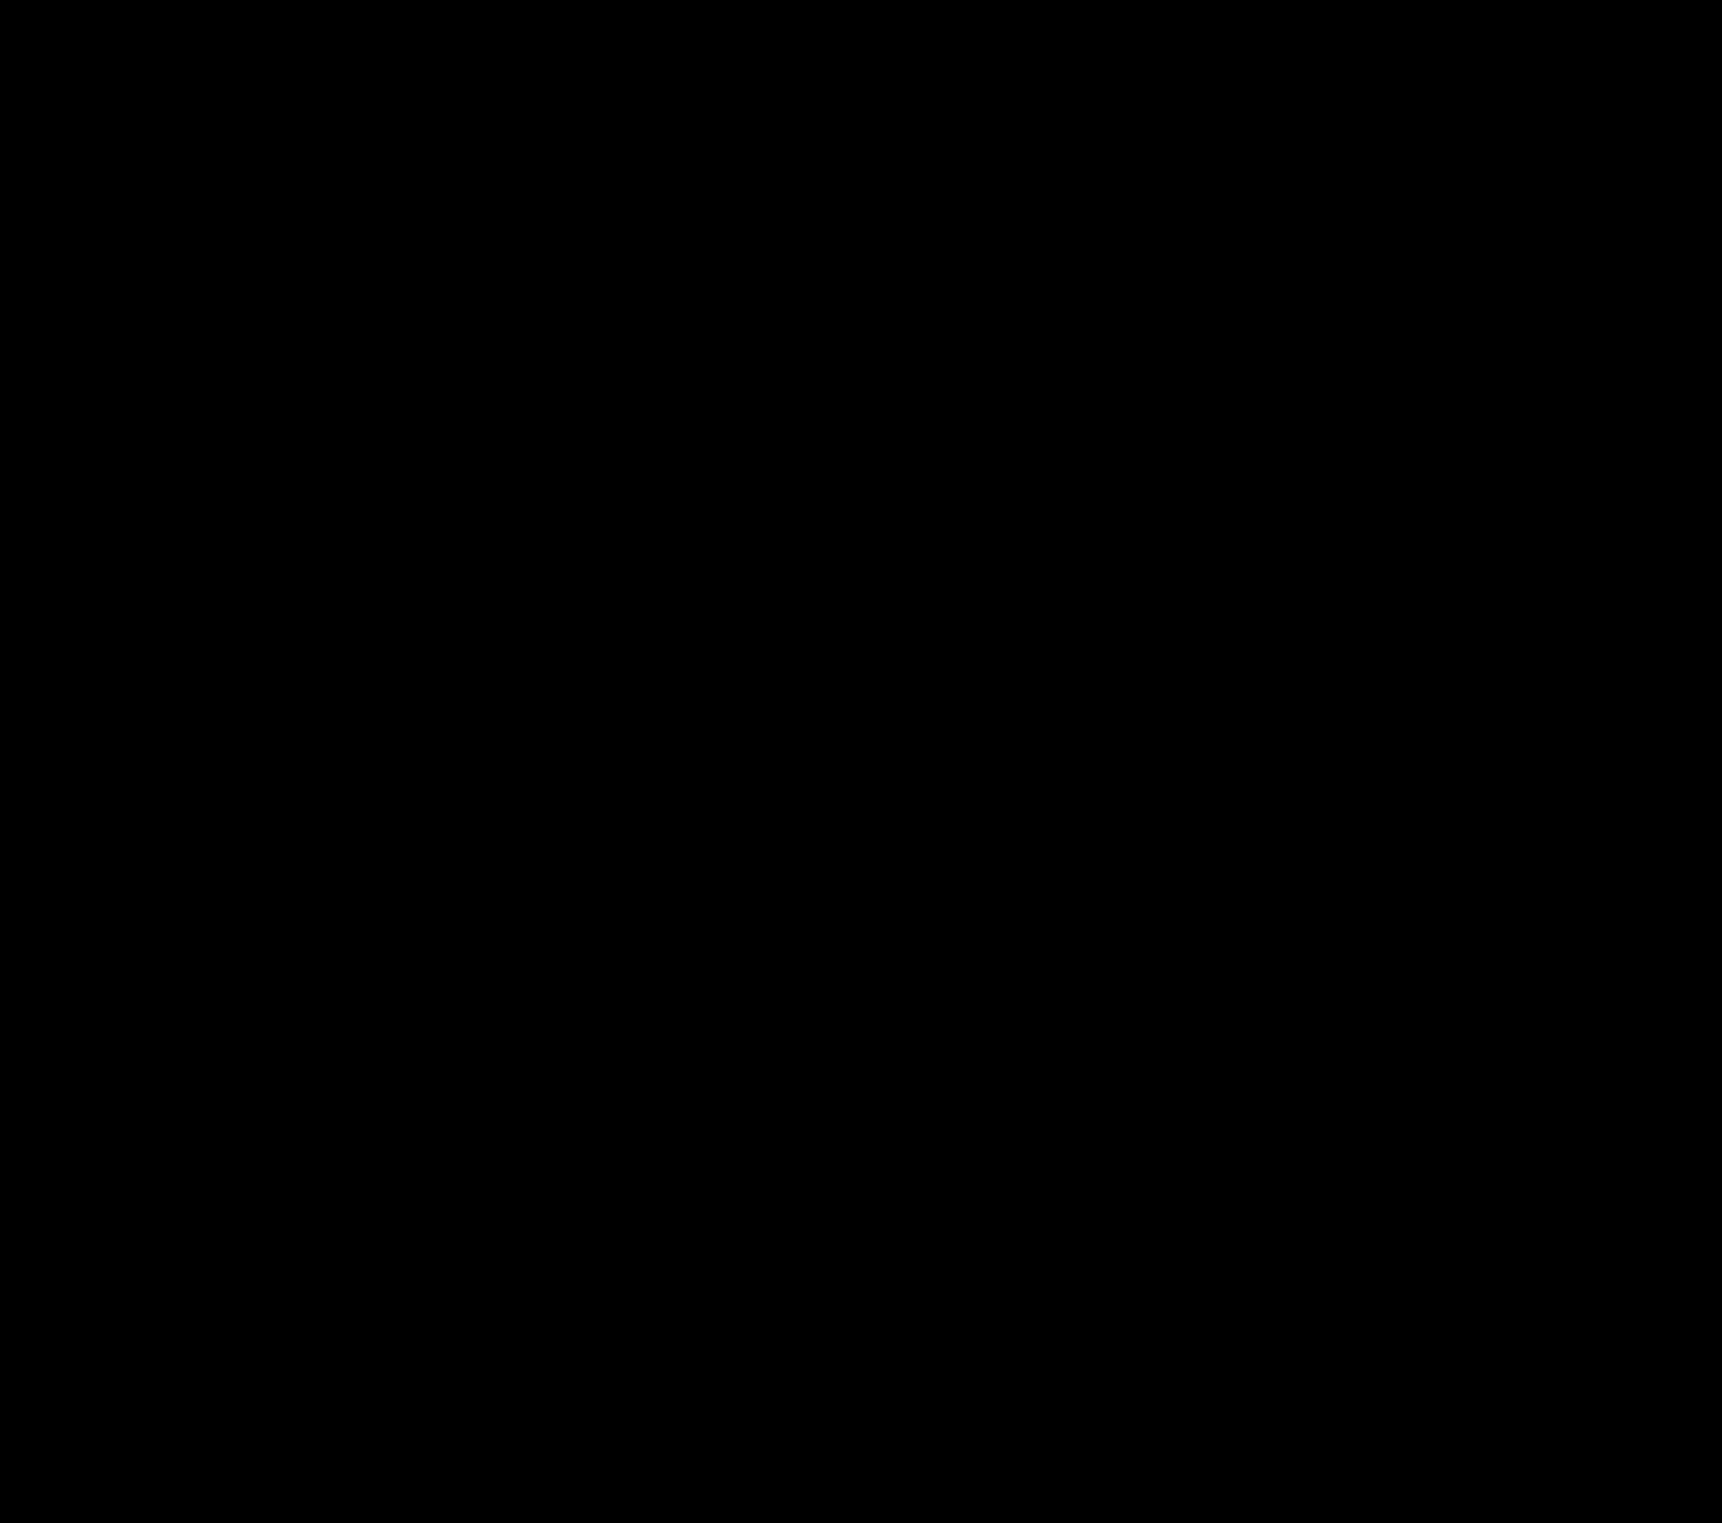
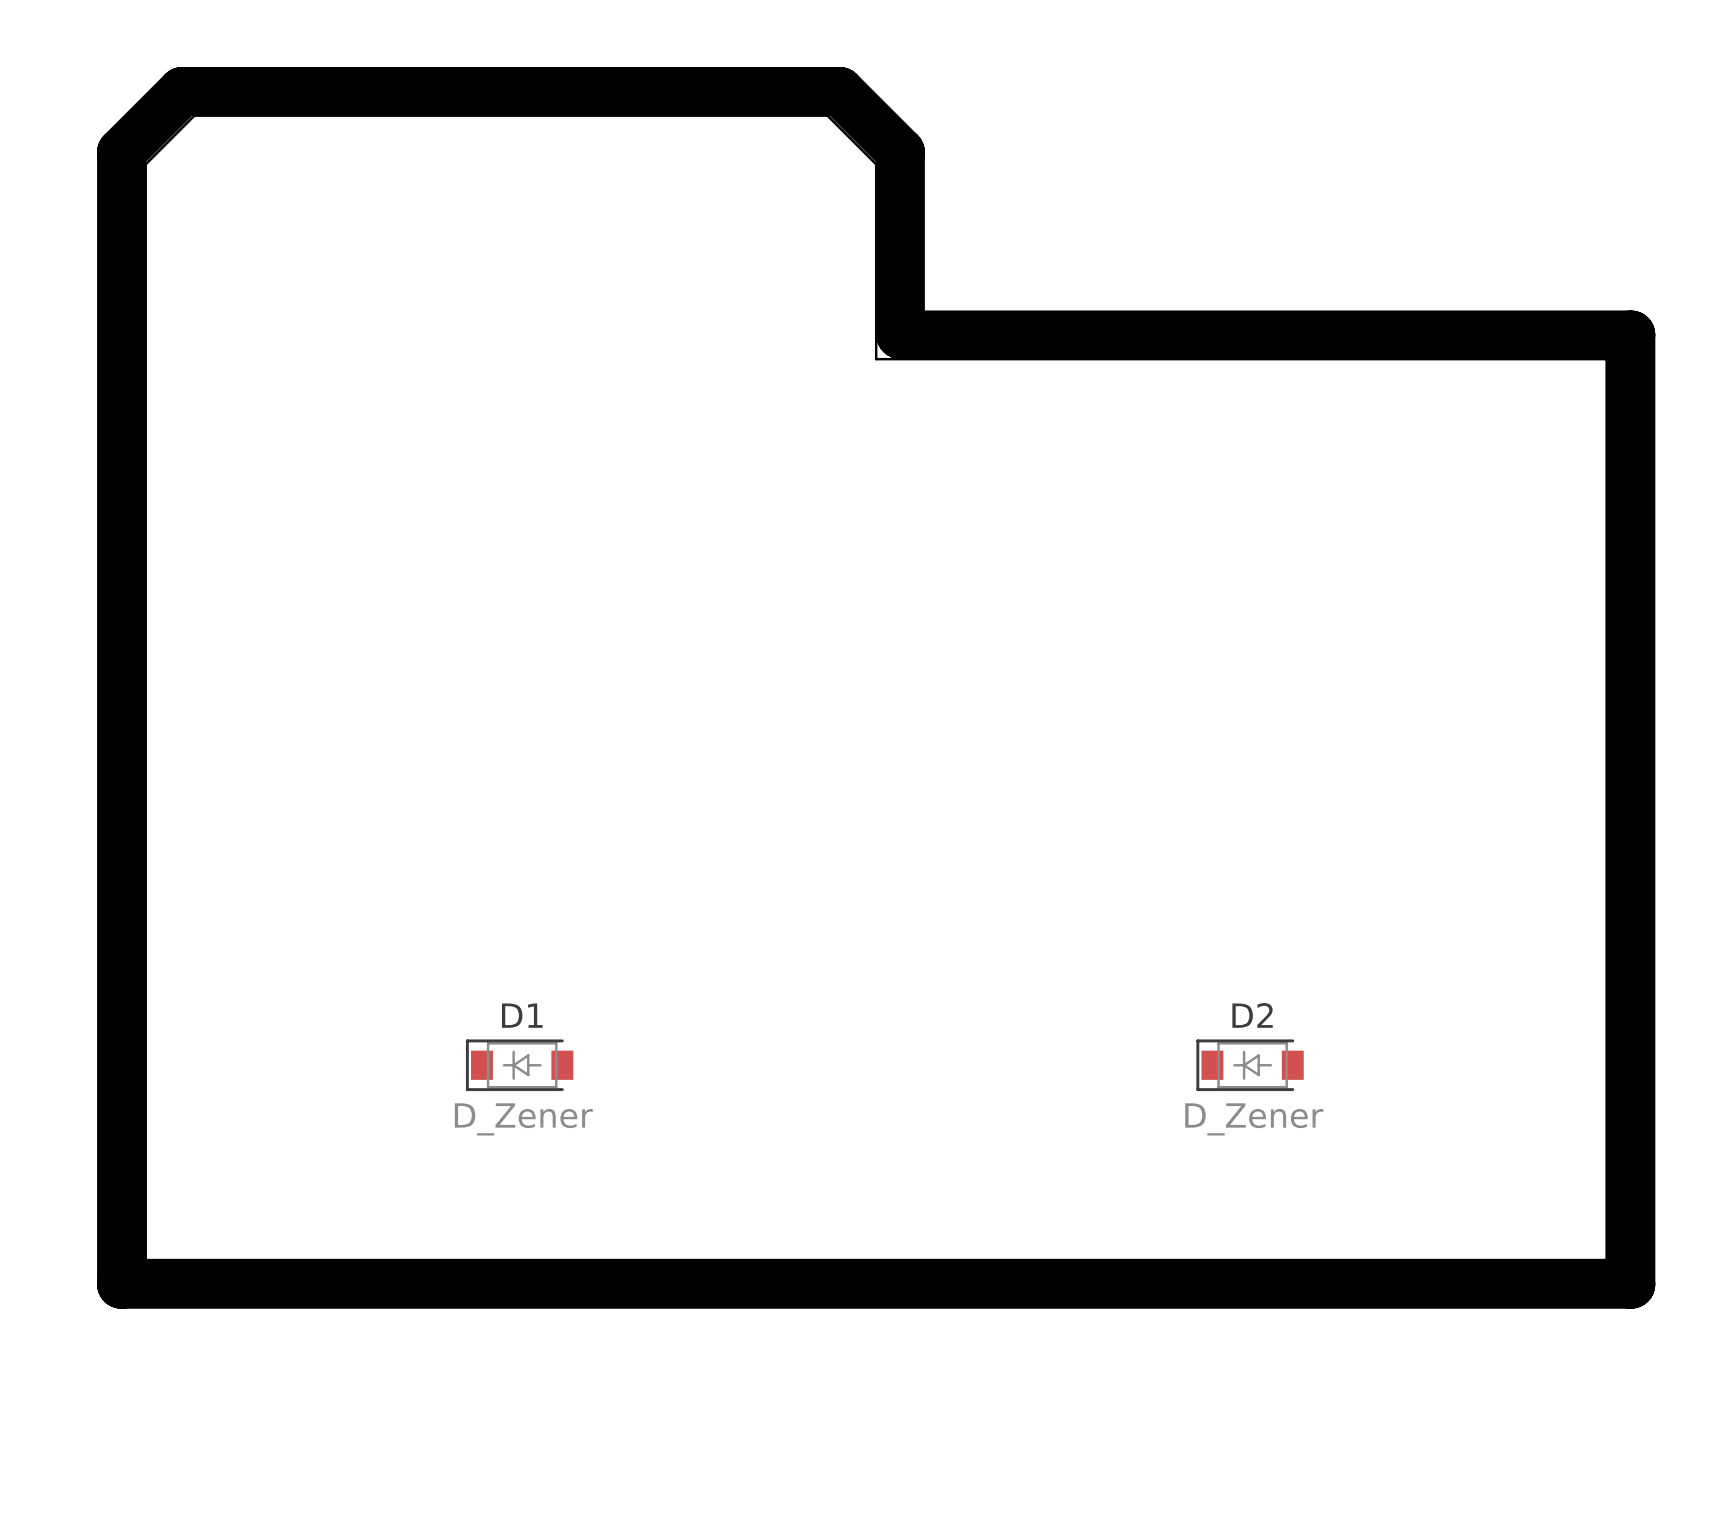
board edge: none -> (182, 91) (121, 152) (121, 1284) (1630, 1284) (1630, 334) (900, 334) (900, 152) (839, 91) (182, 91)
board edge: none -> (194, 115) (145, 164) (145, 1260) (1606, 1260) (1606, 359) (876, 359) (876, 164) (827, 115) (194, 115)
D1: none -> D_Zener (519, 1065)
D2: none -> D_Zener (1250, 1065)

